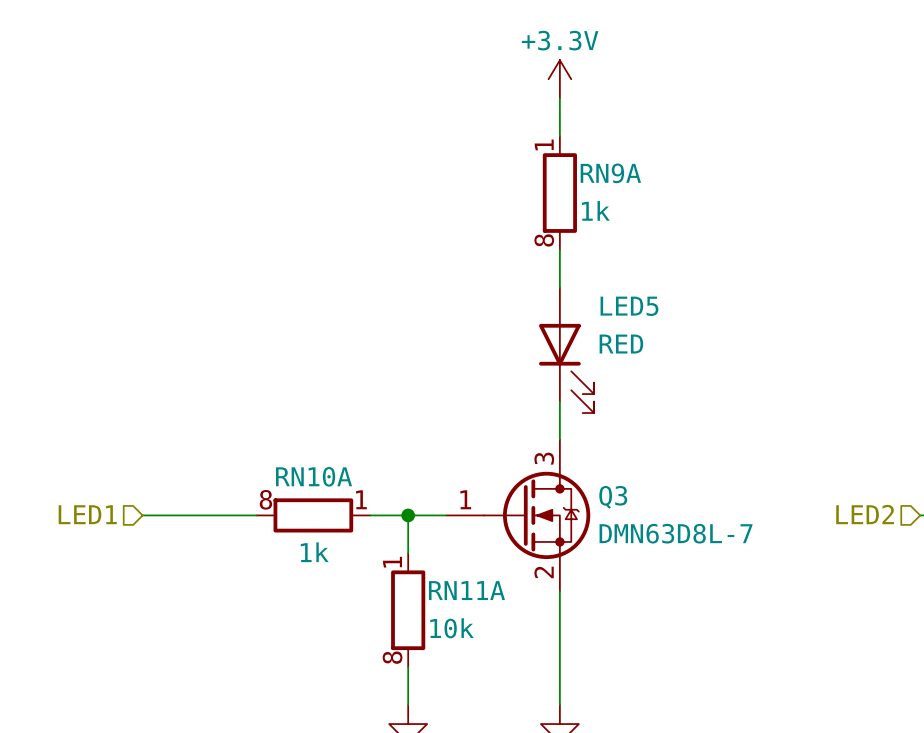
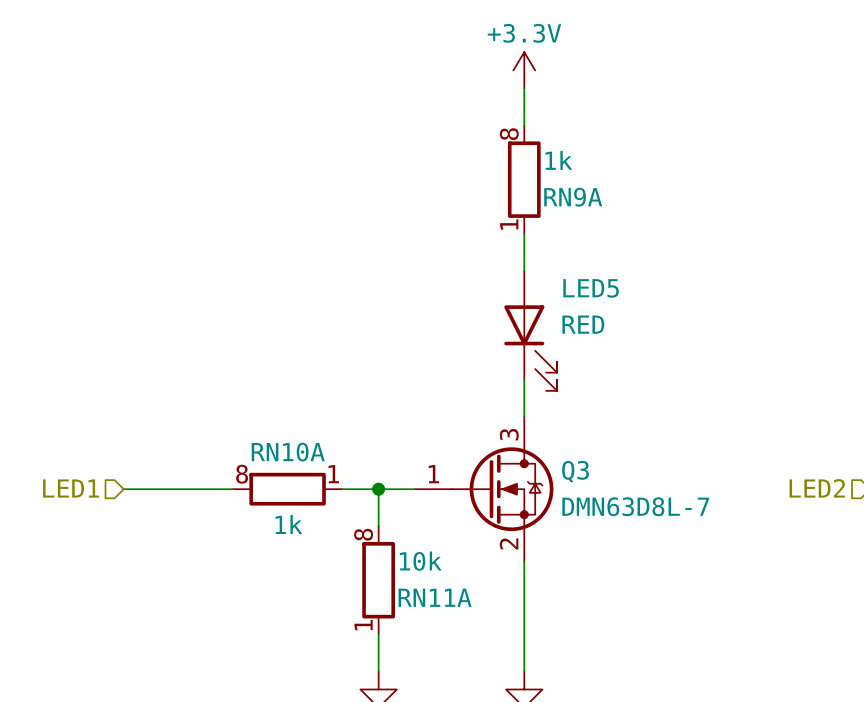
RN9A name position: RN9A (610, 173) -> RN9A (573, 197)
RN9A rotation: 0° (559, 193) -> 180° (524, 179)
RN9A value position: 1k (595, 210) -> 1k (558, 160)
RN11A name position: RN11A (466, 590) -> RN11A (435, 597)
RN11A rotation: 0° (408, 610) -> 180° (378, 580)
RN11A value position: 10k (452, 628) -> 10k (420, 561)

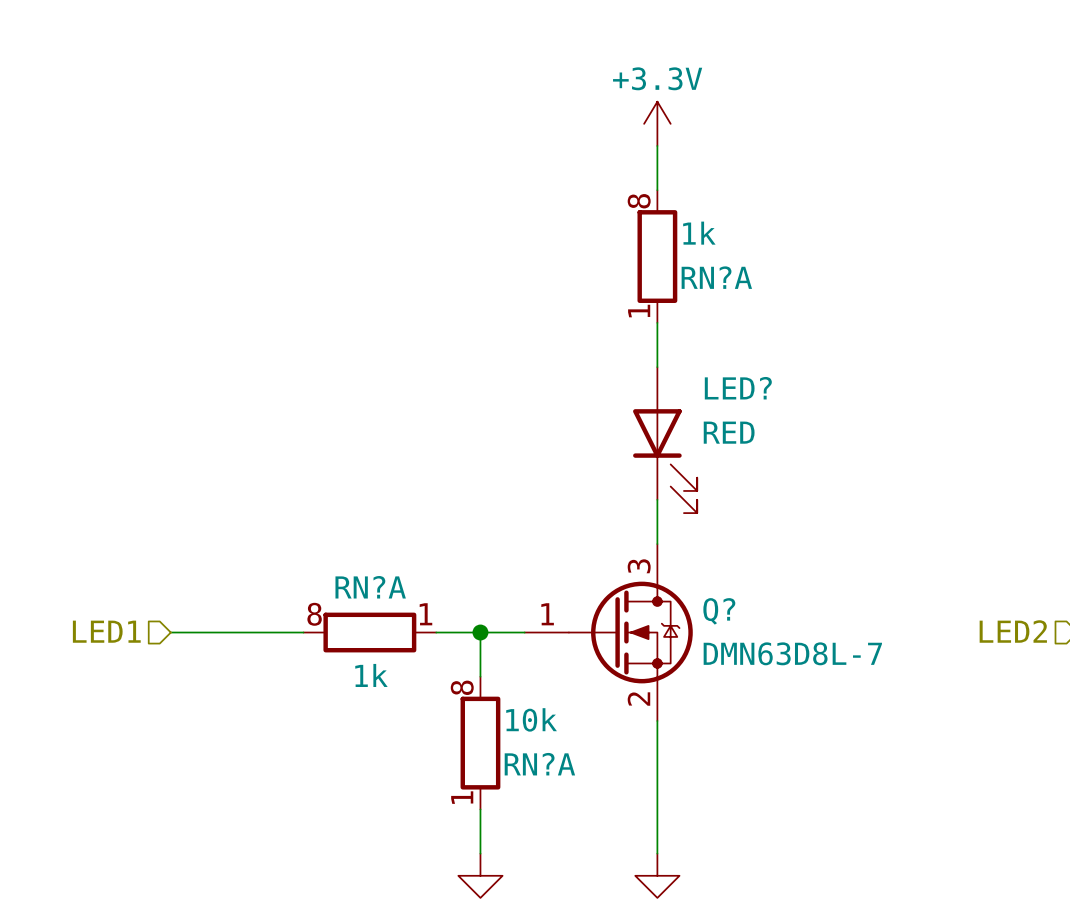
RN9A name: RN9A (573, 197) -> RN?A (716, 277)
LED5 name: LED5 (591, 288) -> LED? (738, 388)
RN10A name: RN10A (288, 452) -> RN?A (370, 587)
Q3 name: Q3 (575, 471) -> Q? (719, 611)
RN11A name: RN11A (435, 597) -> RN?A (539, 764)

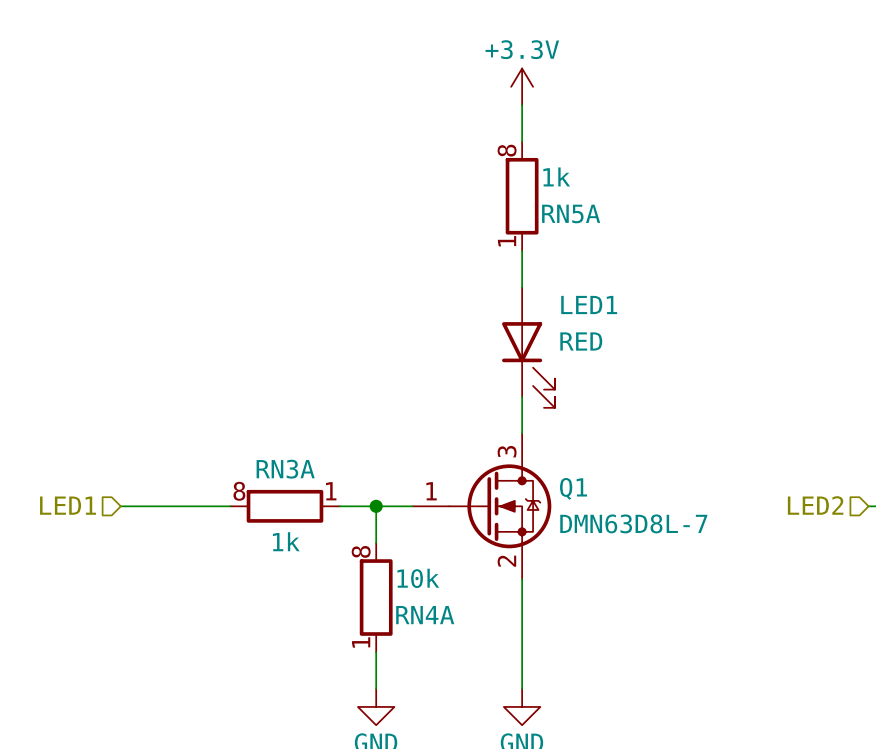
RN?A name: RN?A (716, 277) -> RN5A (571, 213)
LED? name: LED? (738, 388) -> LED1 (589, 305)
RN?A name: RN?A (370, 587) -> RN3A (285, 469)
Q? name: Q? (719, 611) -> Q1 (573, 488)
RN?A name: RN?A (539, 764) -> RN4A (425, 615)

